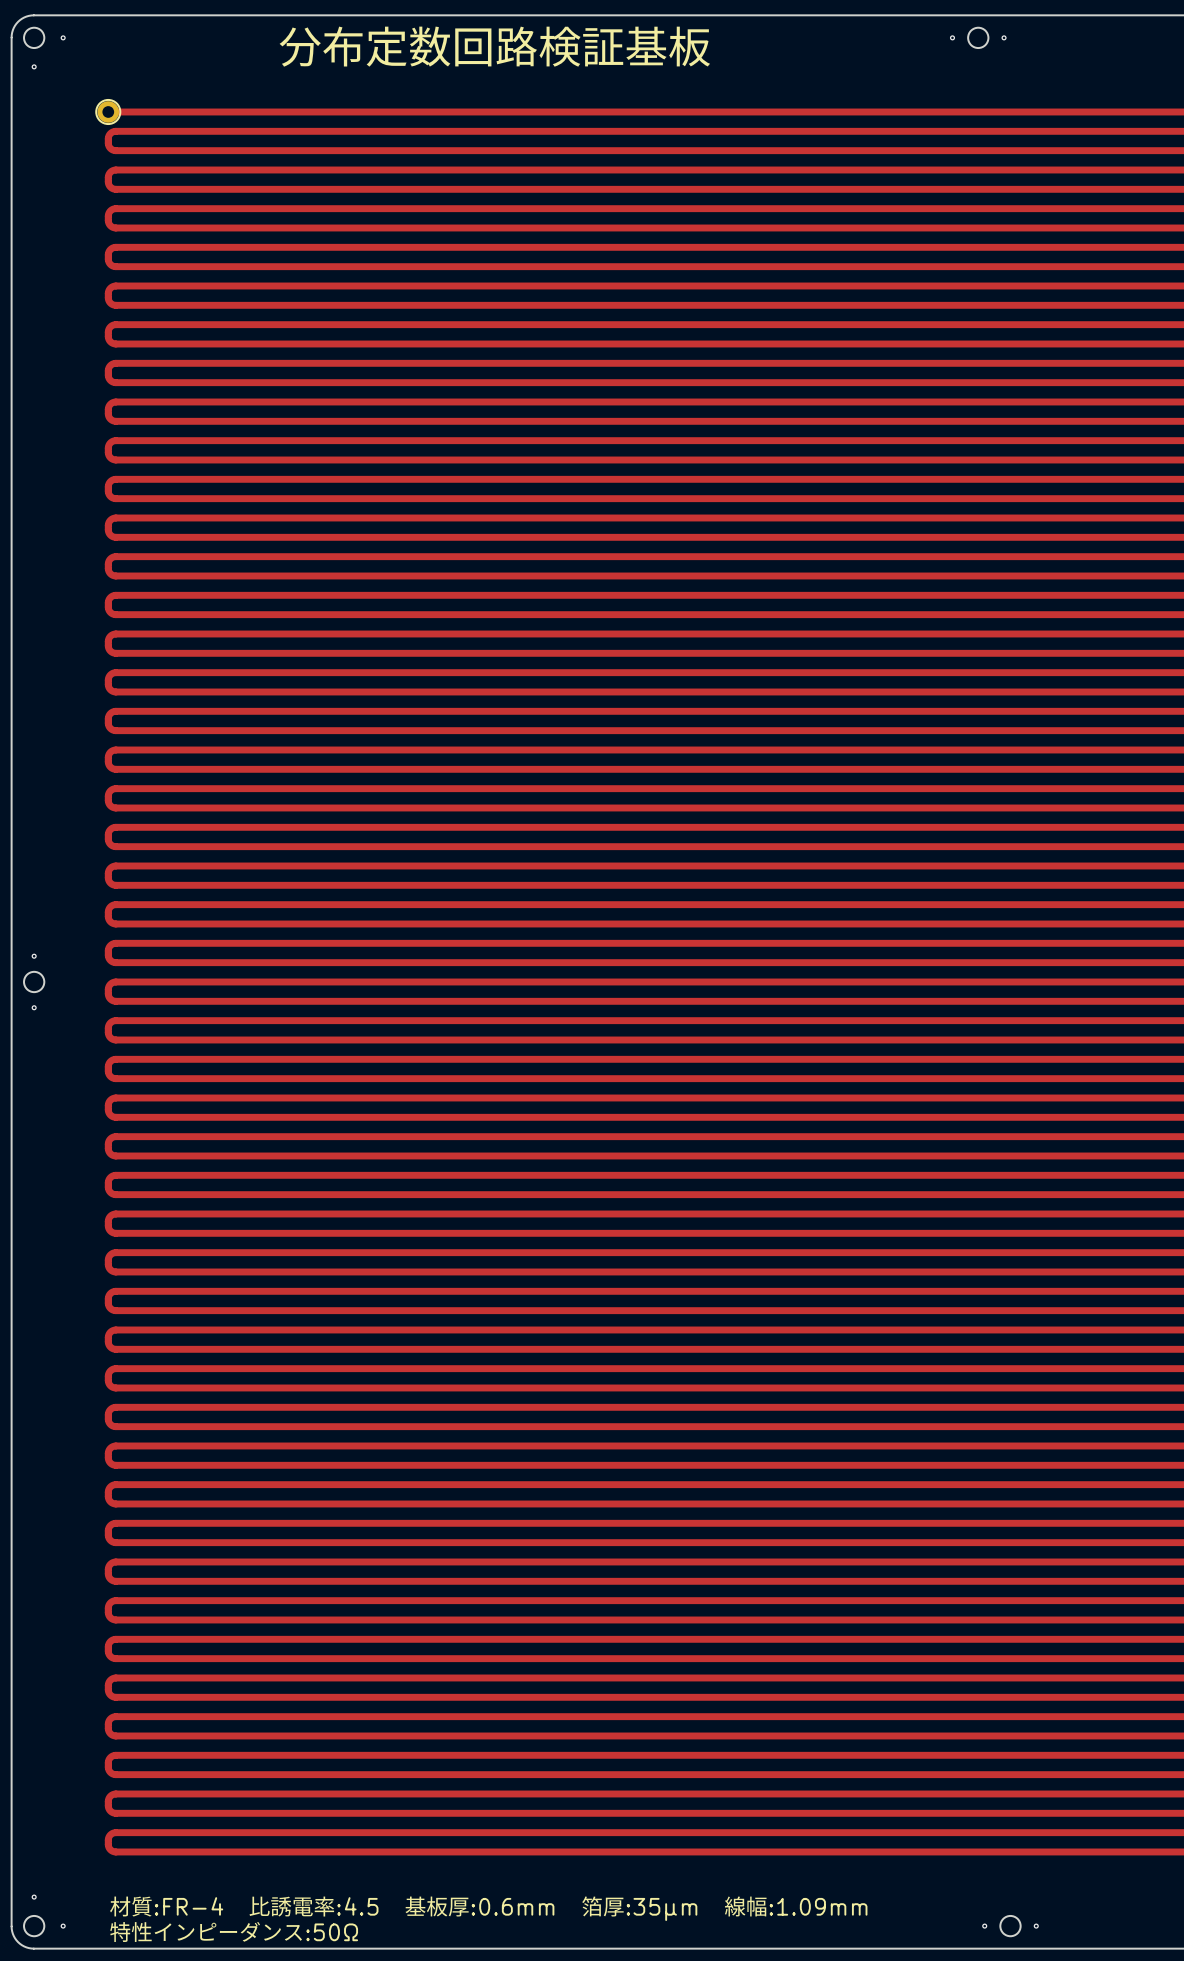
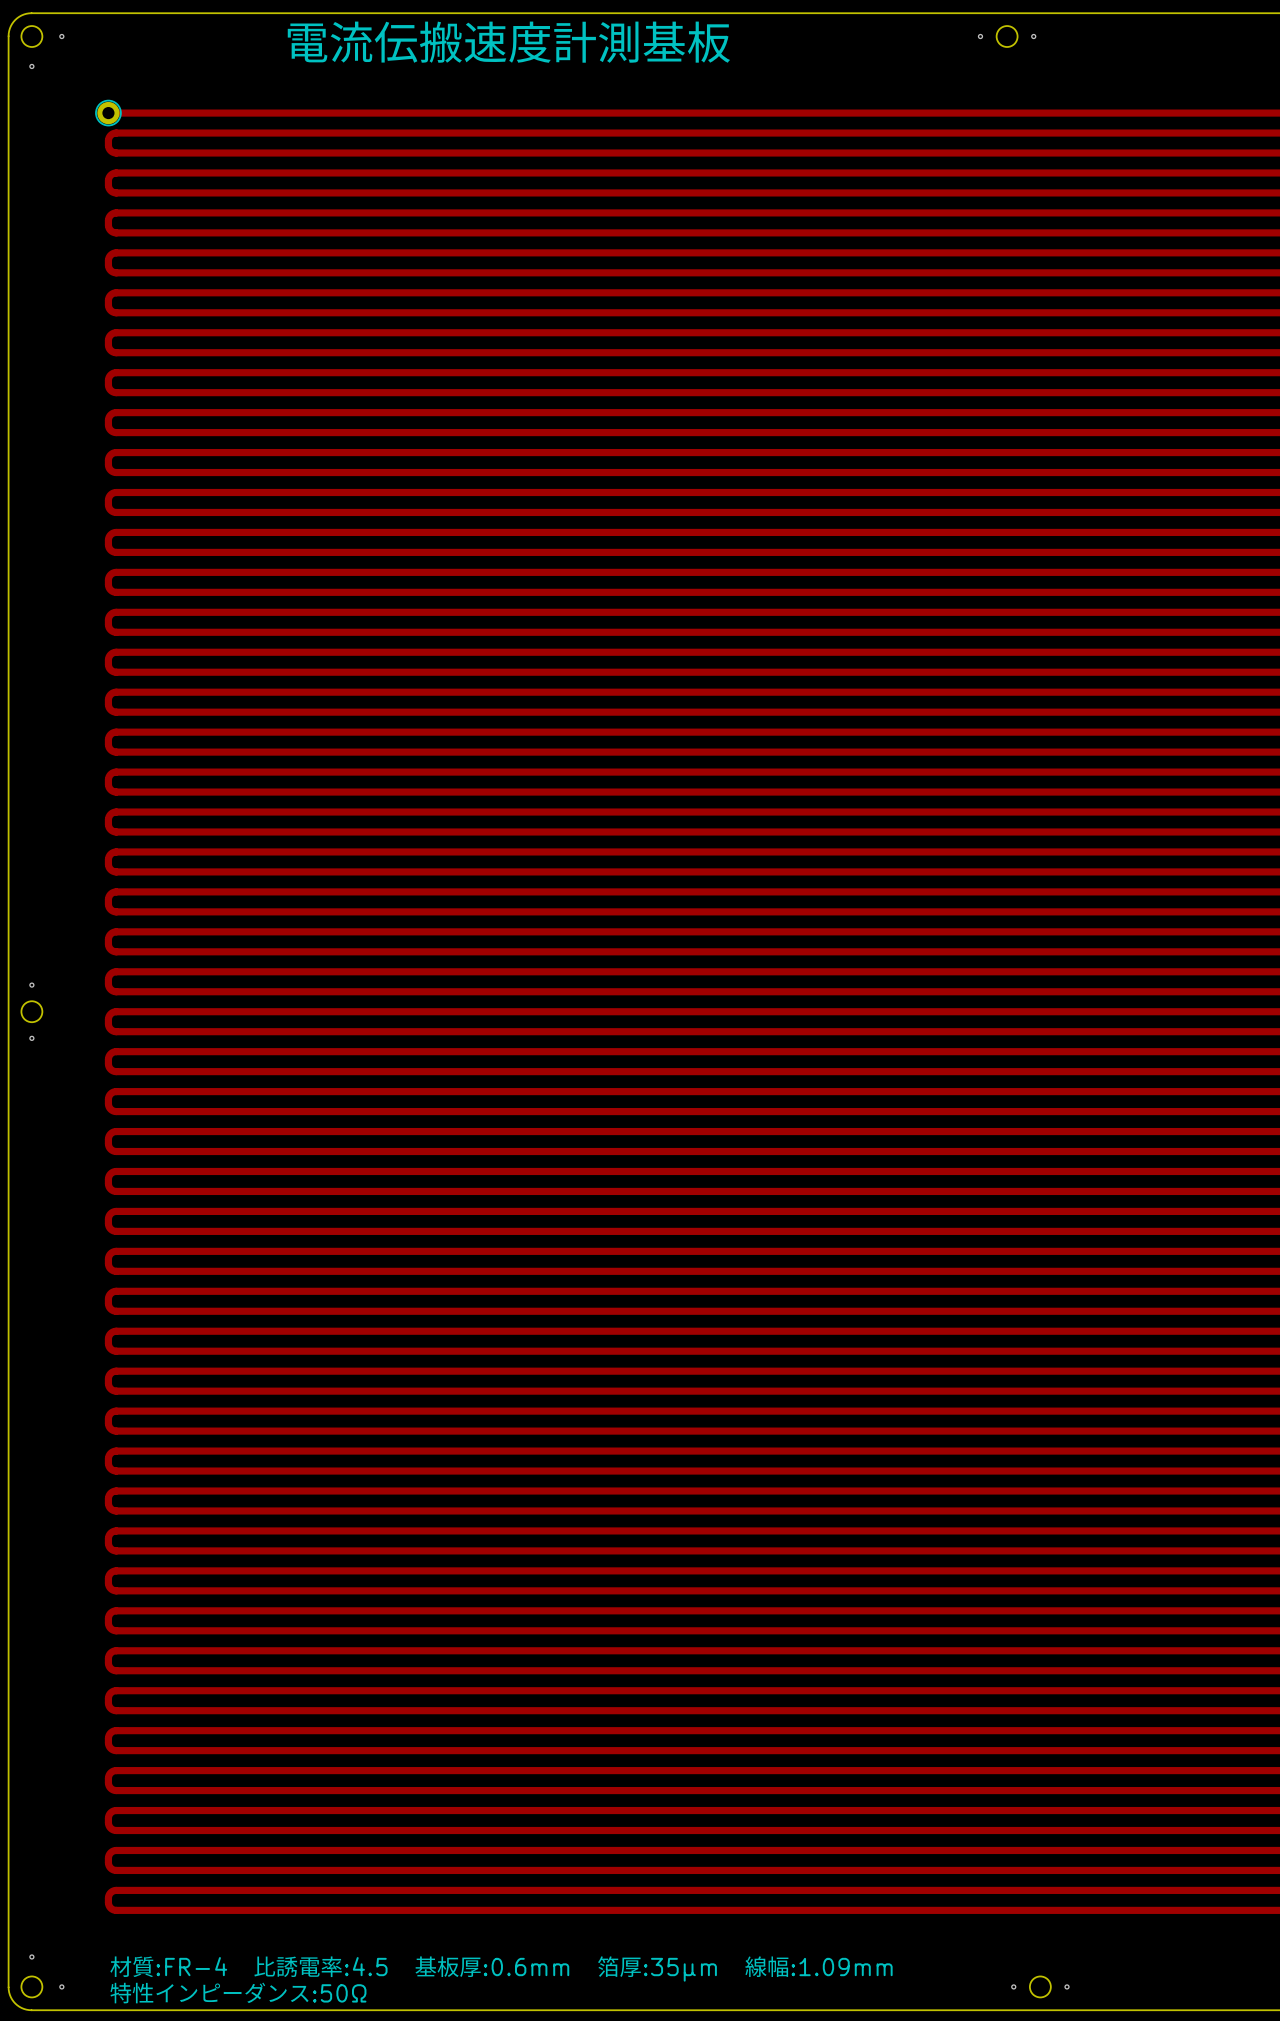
text: 分布定数回路検証基板 (494, 46) -> 電流伝搬速度計測基板 (508, 42)

